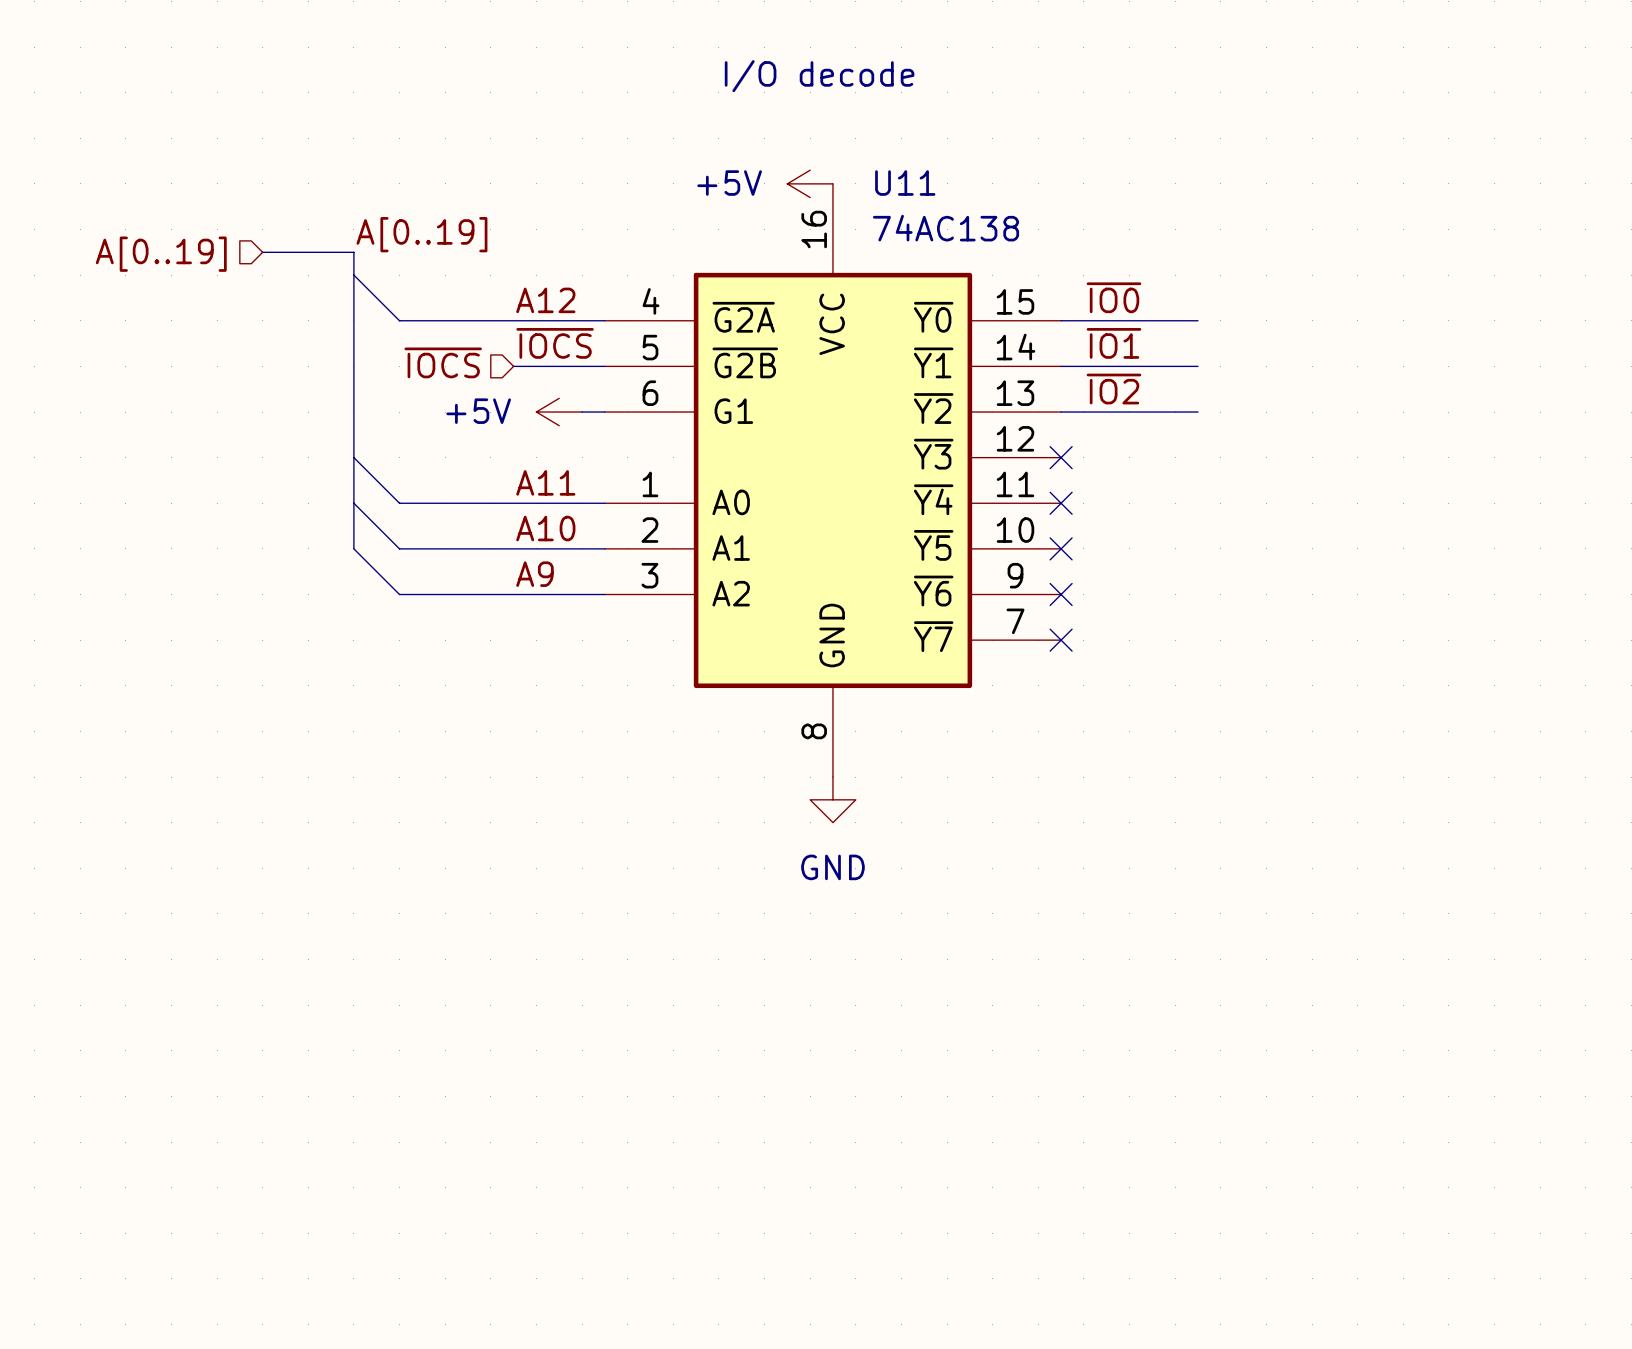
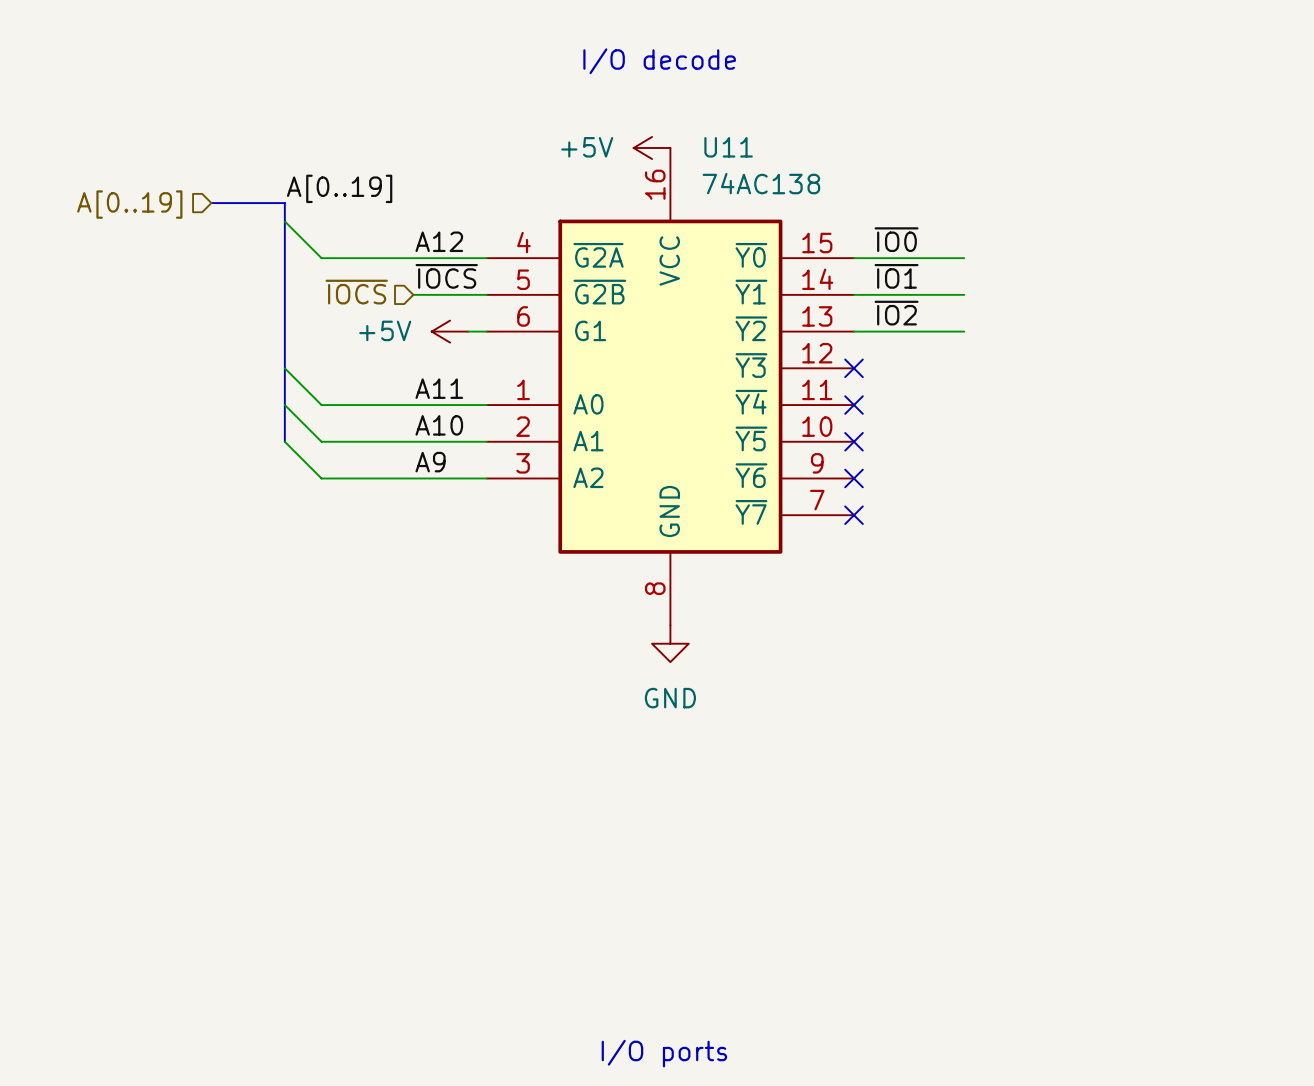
text: none -> I/O ports (664, 1053)

